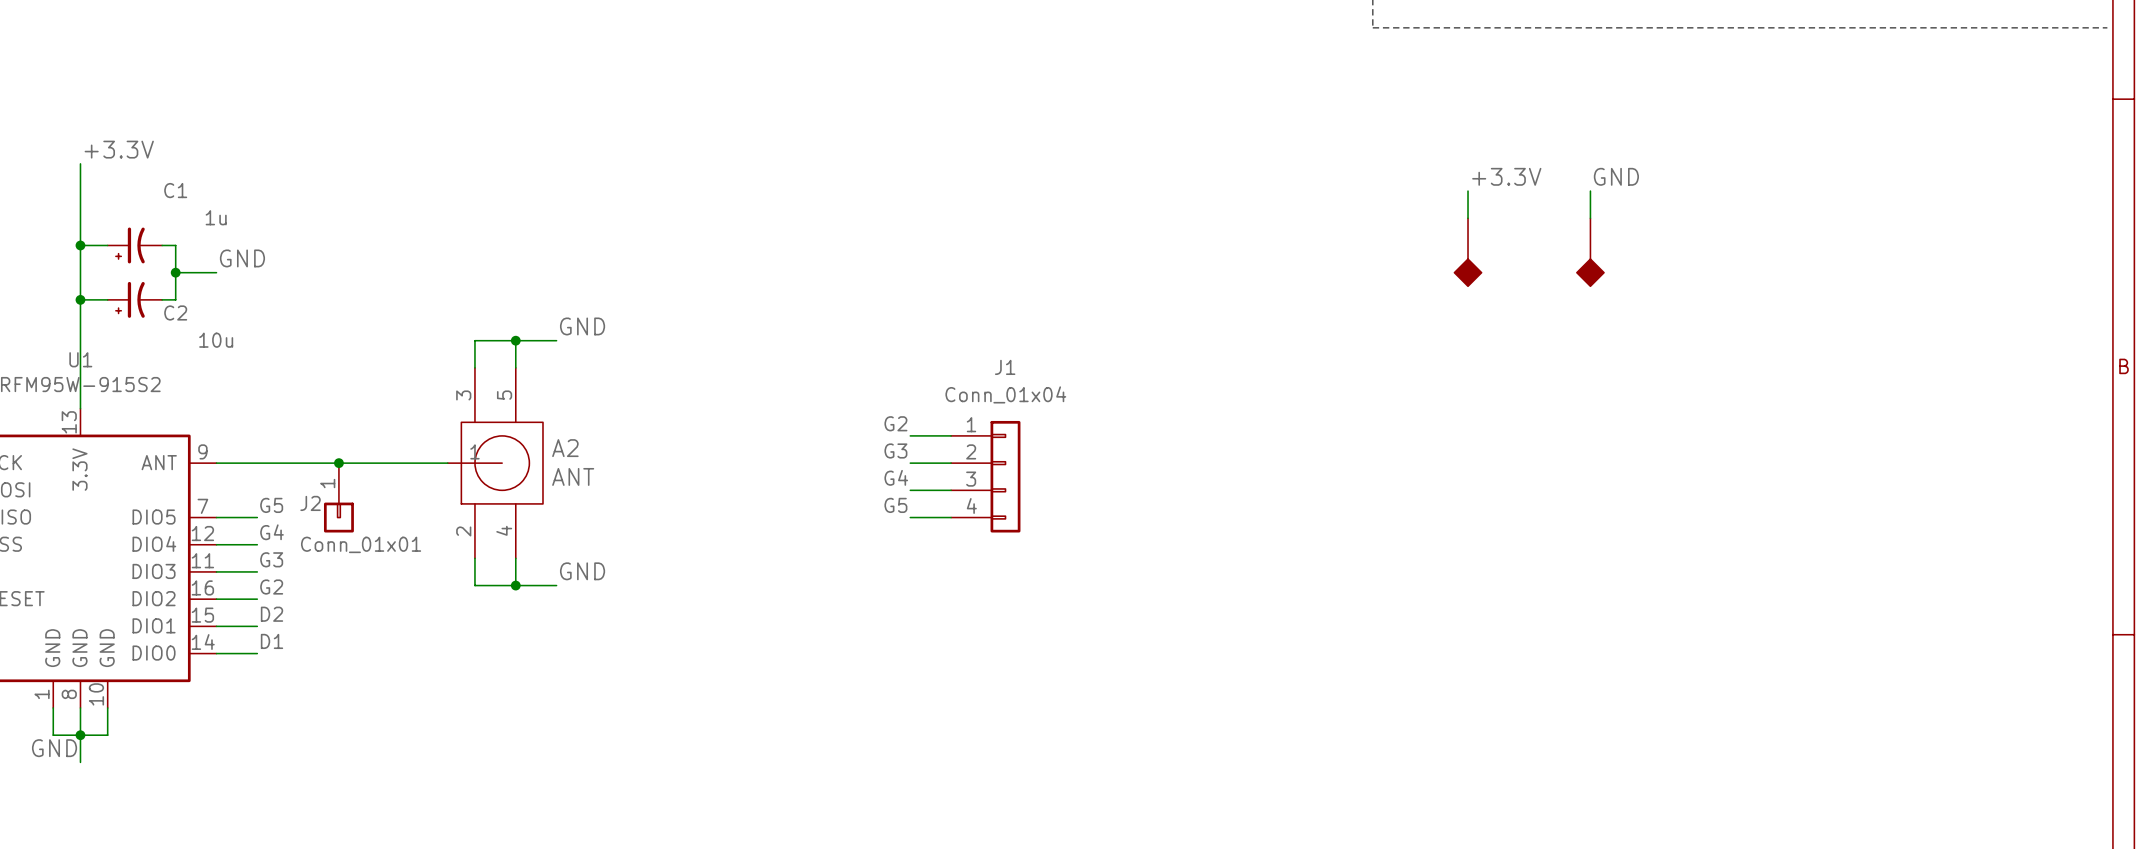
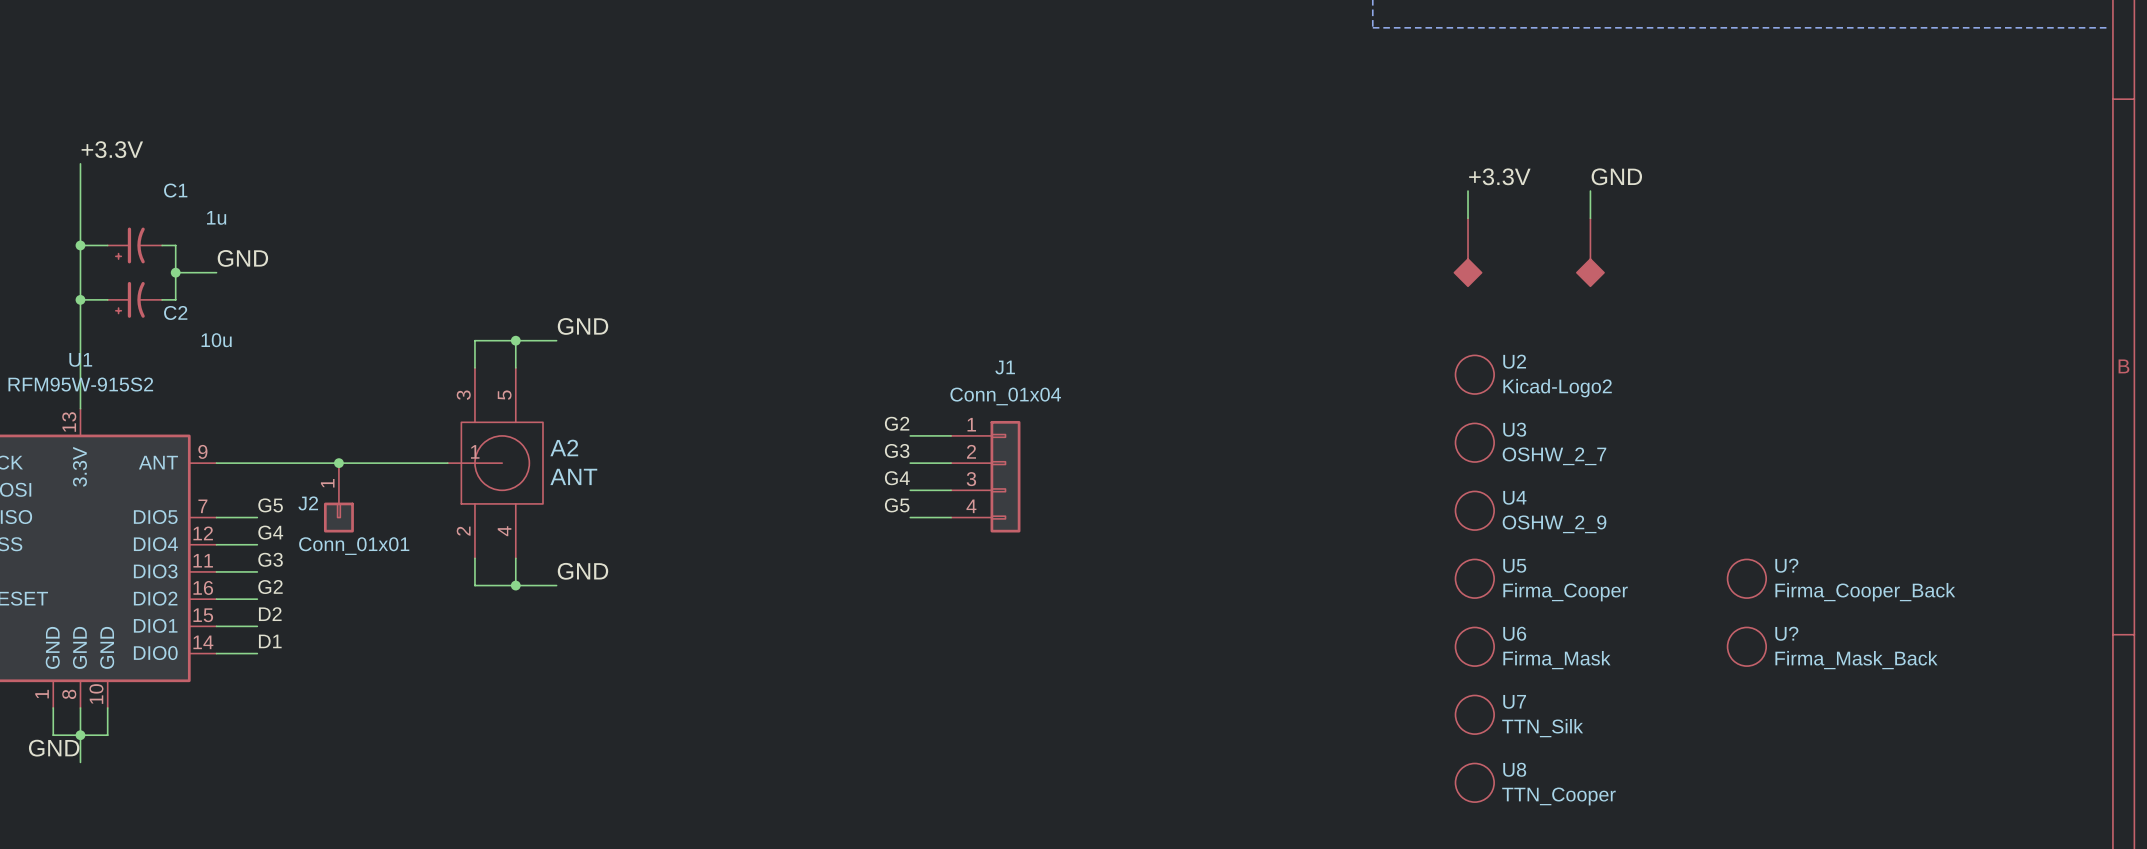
U2: none -> Kicad-Logo2 (1474, 374)
U3: none -> OSHW_2_7 (1474, 442)
U4: none -> OSHW_2_9 (1474, 510)
U5: none -> Firma_Cooper (1474, 578)
U?: none -> Firma_Cooper_Back (1746, 578)
U6: none -> Firma_Mask (1474, 646)
U?: none -> Firma_Mask_Back (1746, 646)
U7: none -> TTN_Silk (1474, 714)
U8: none -> TTN_Cooper (1474, 782)

